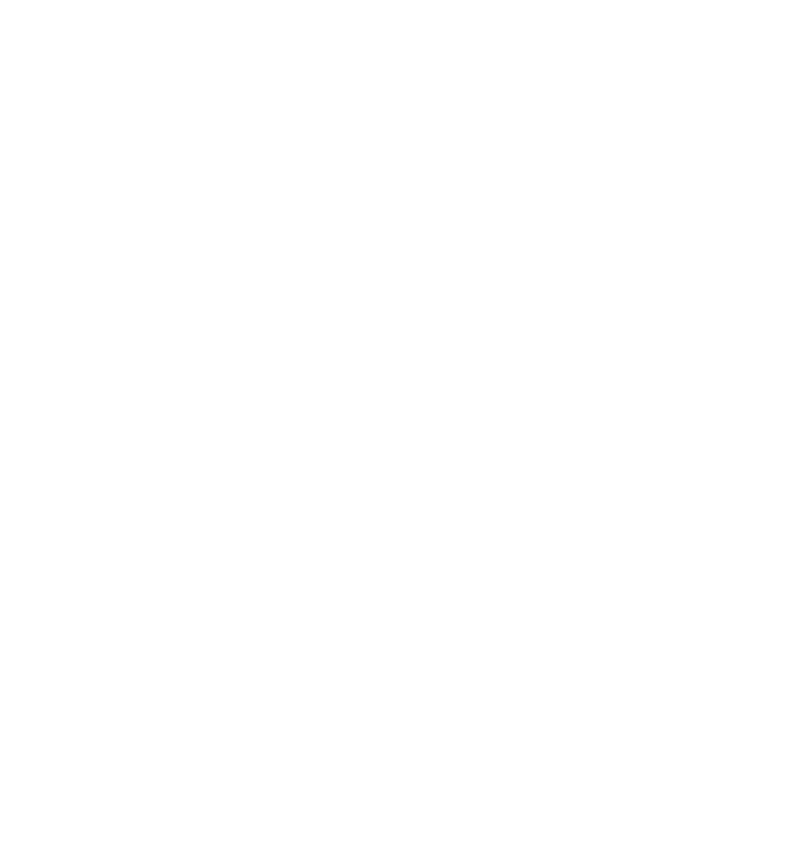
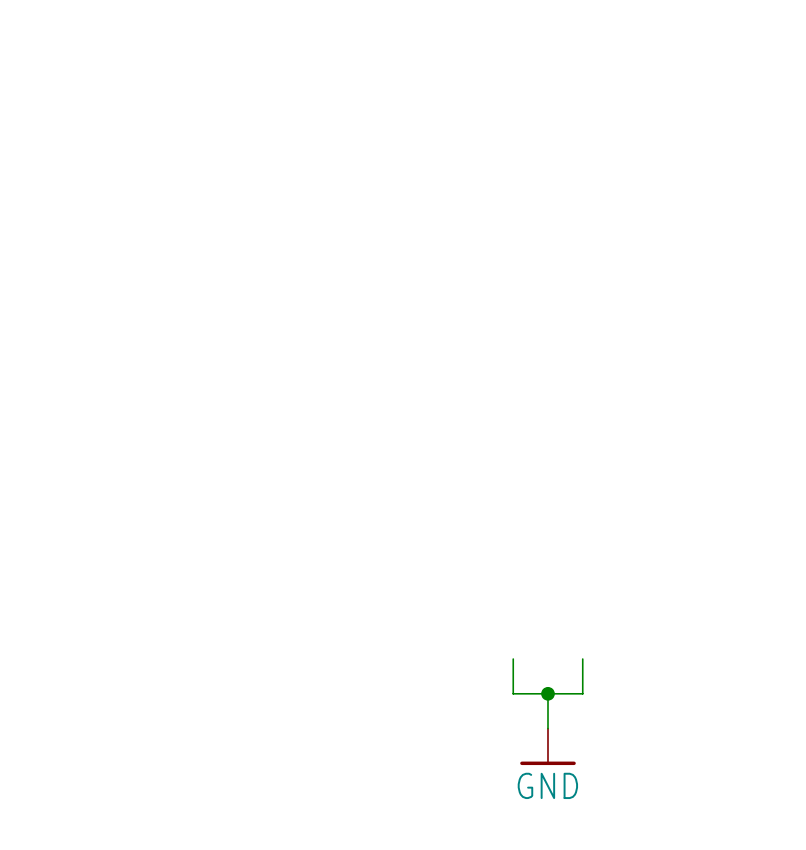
wire: none -> (513, 659) (513, 693) (582, 693) (582, 659)
wire: none -> (547, 693) (547, 728)
junction: none -> (547, 693)
power symbol: none -> GND (547, 746)

